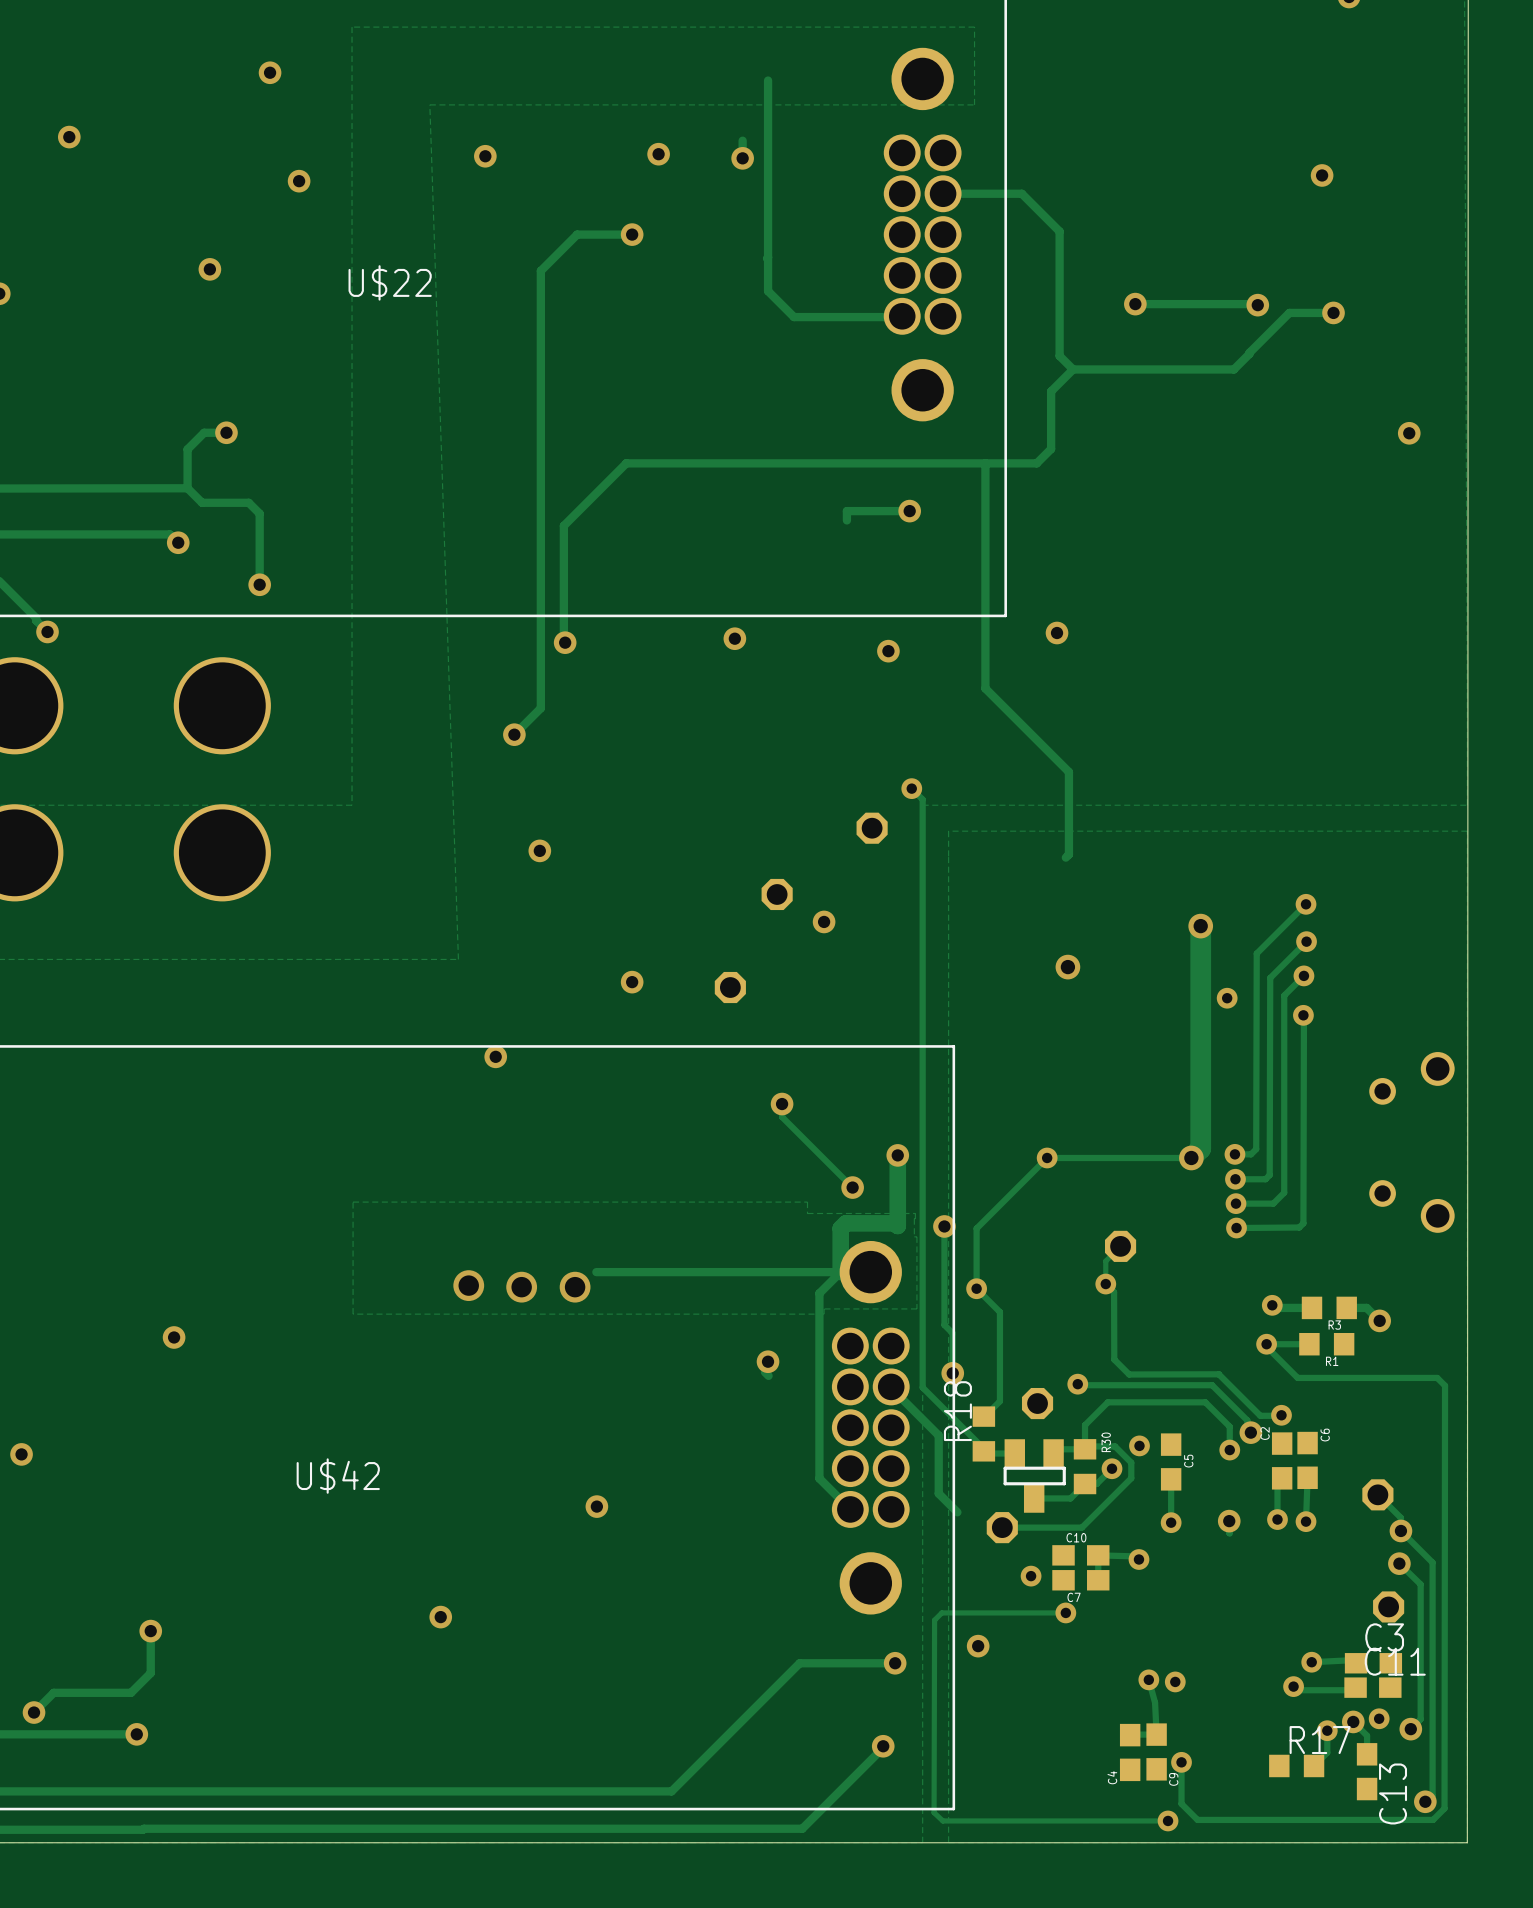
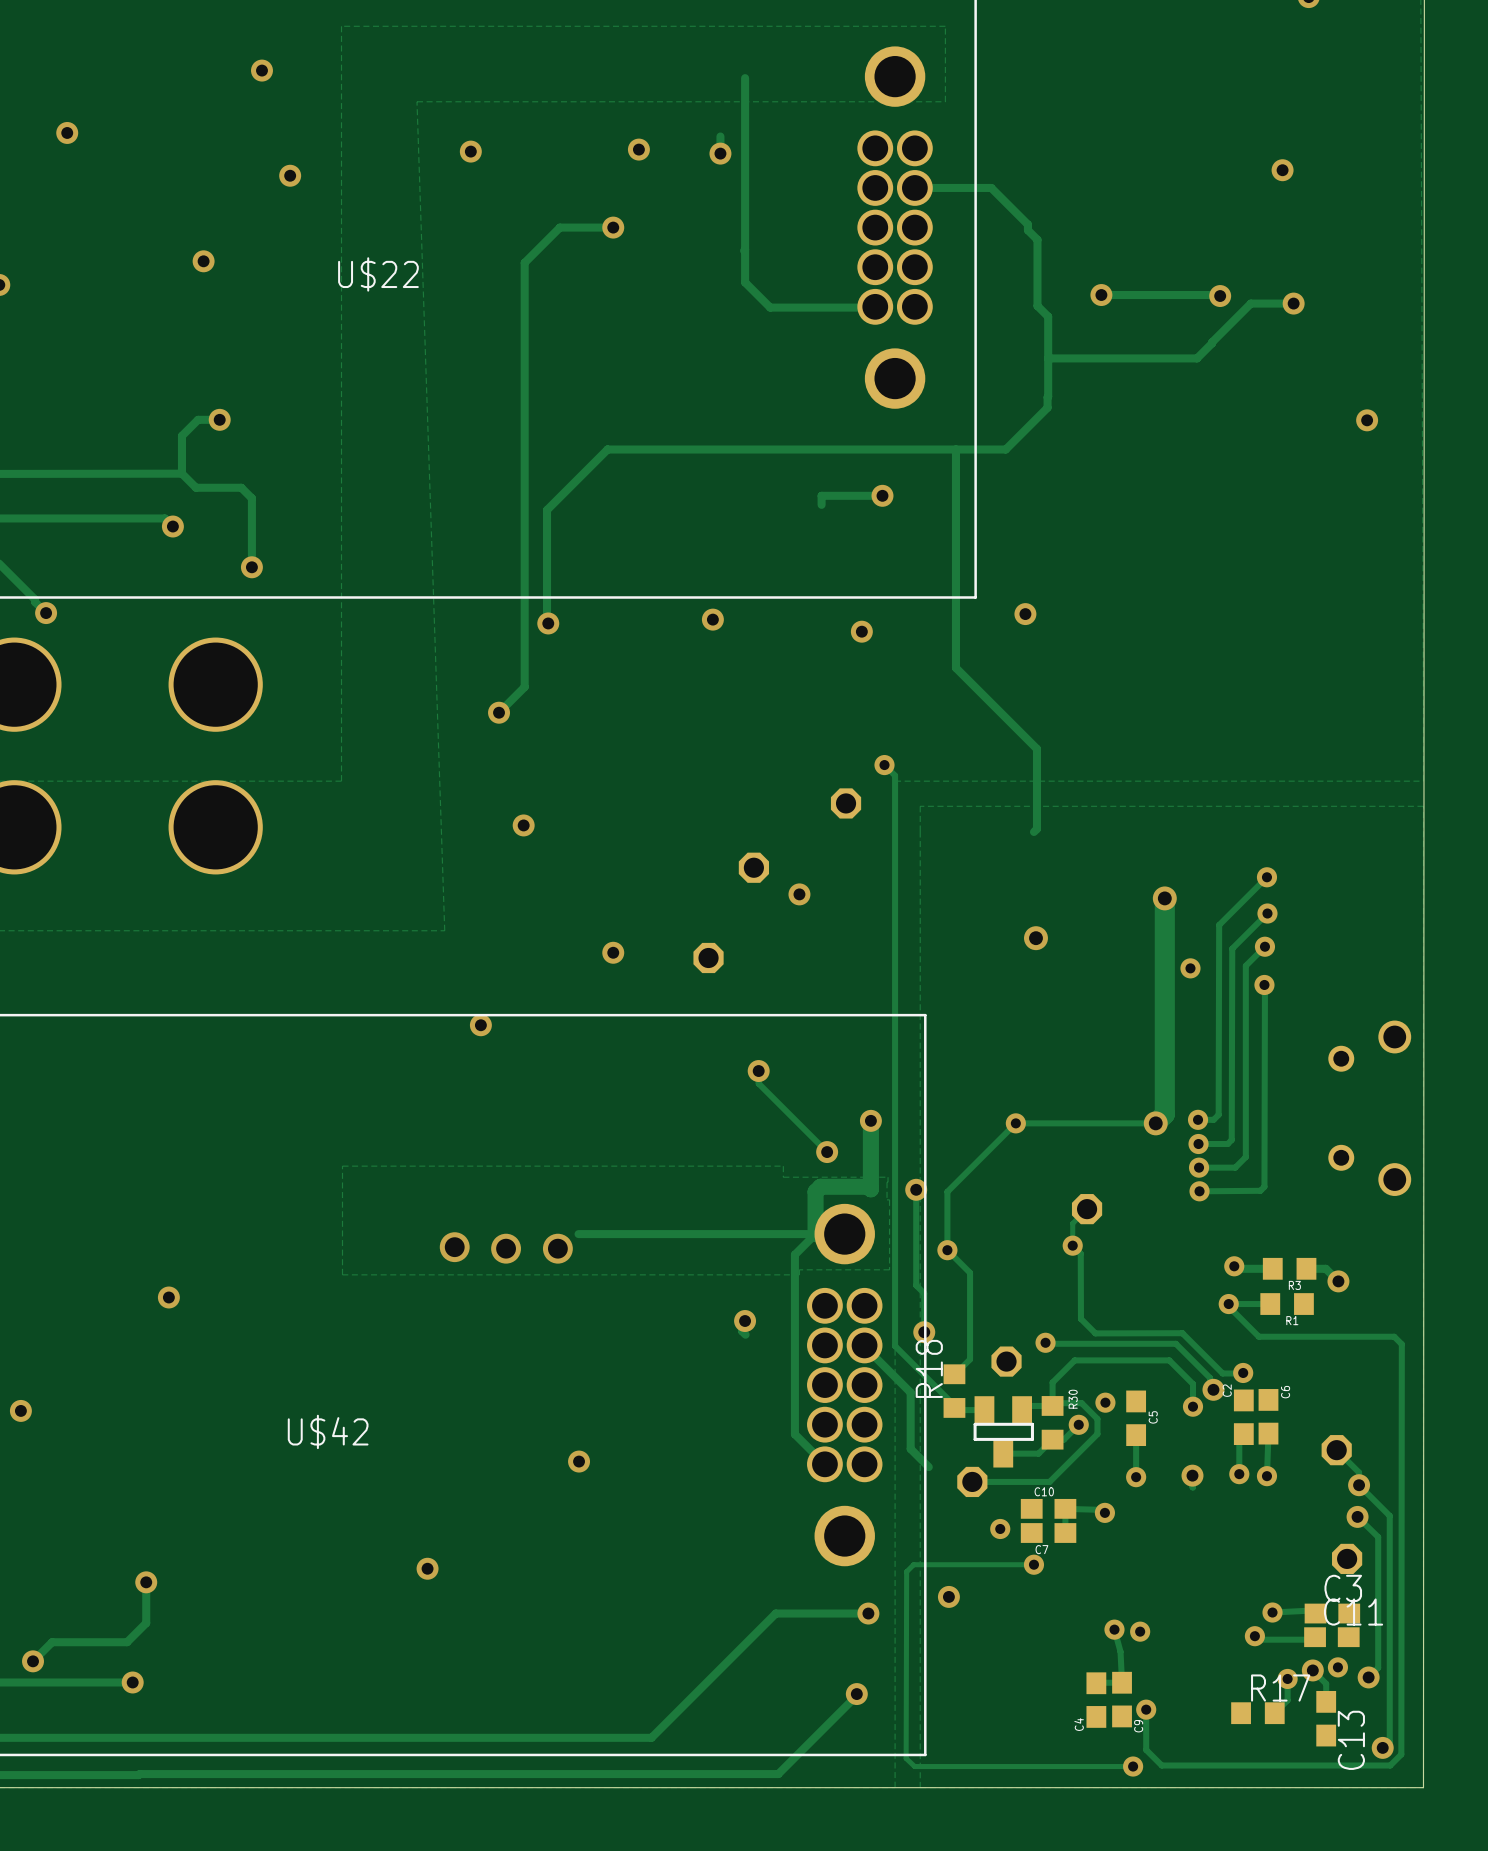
track: (1059, 237) (1059, 355) (1073, 369) -> (1027, 230) (1037, 239) (1037, 305) (1048, 316) (1048, 396) (1047, 407) (1019, 435)
track: (1073, 369) (1051, 391) (1051, 449) -> none

